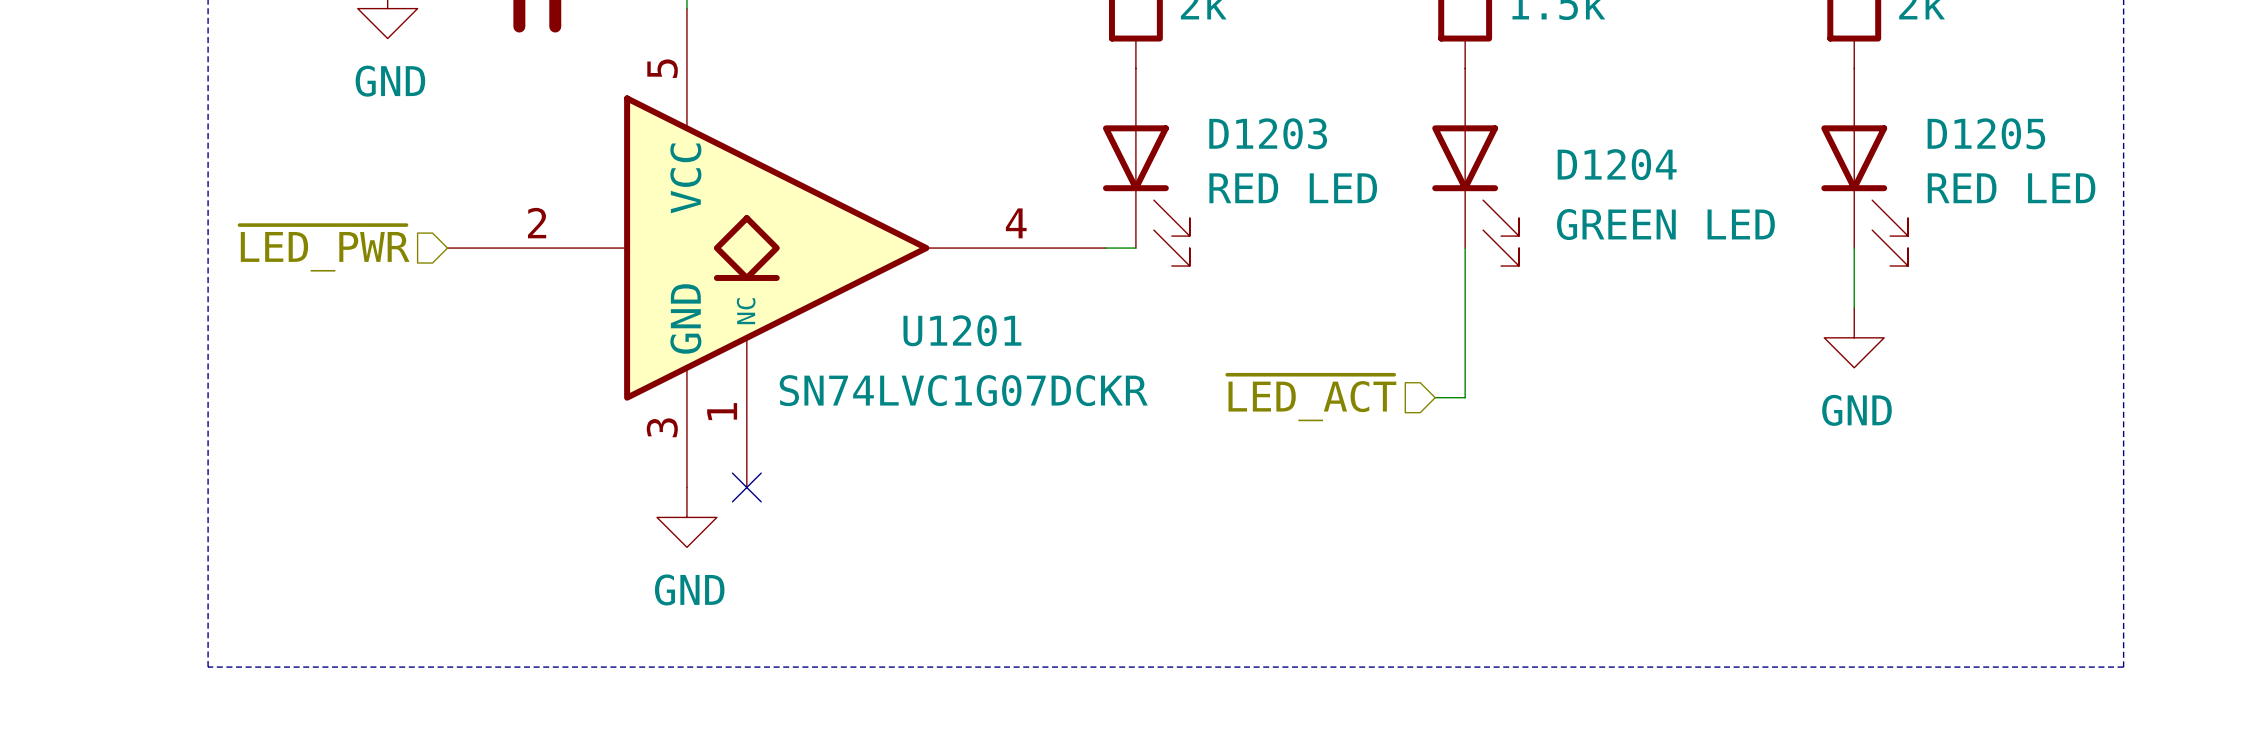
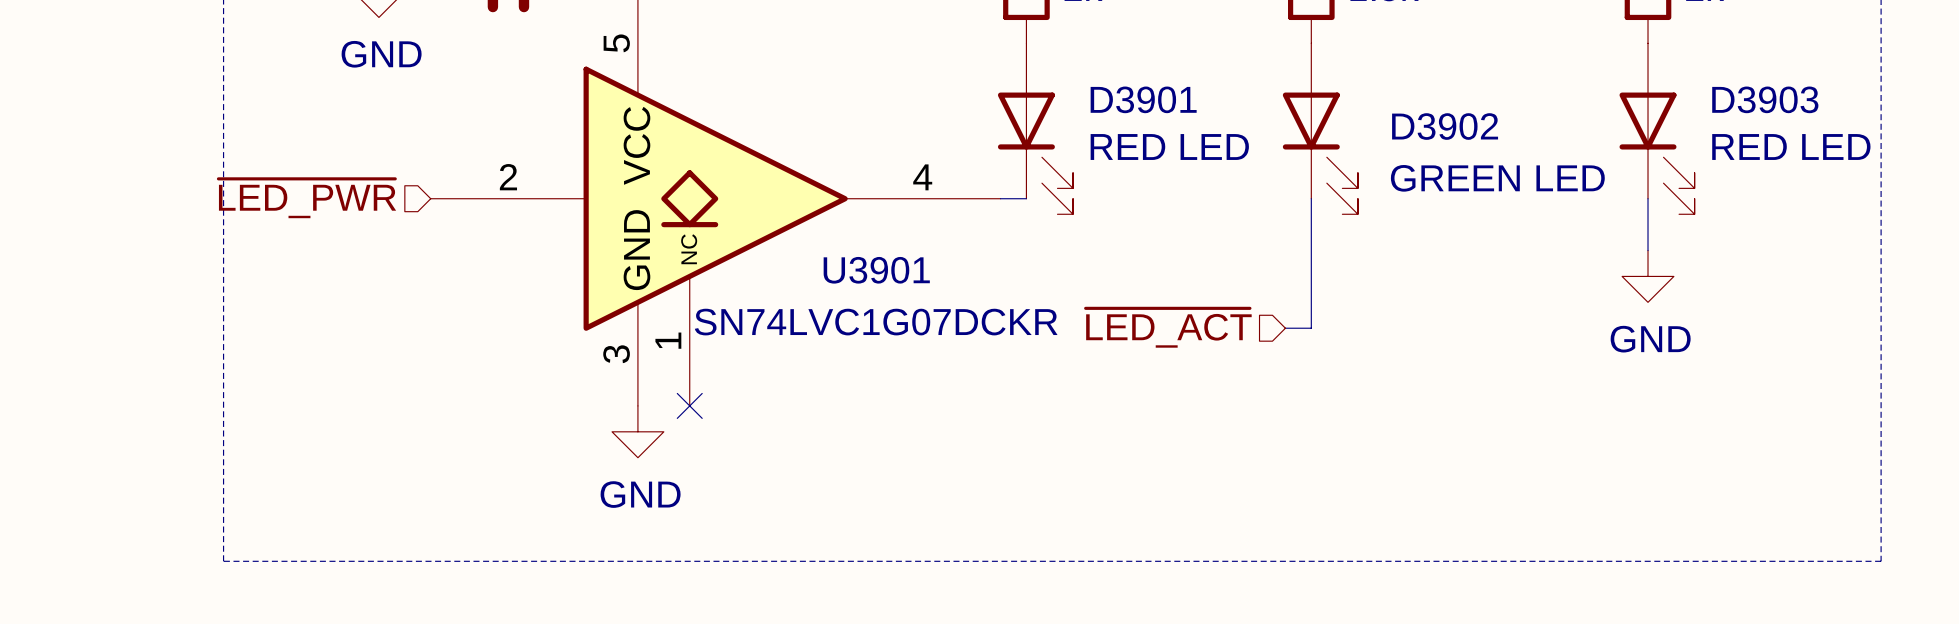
D1203 name: D1203 (1268, 133) -> D3901 (1143, 99)
D1205 name: D1205 (1986, 133) -> D3903 (1765, 99)
D1204 name: D1204 (1617, 164) -> D3902 (1445, 126)
U1201 name: U1201 (962, 330) -> U3901 (876, 270)

